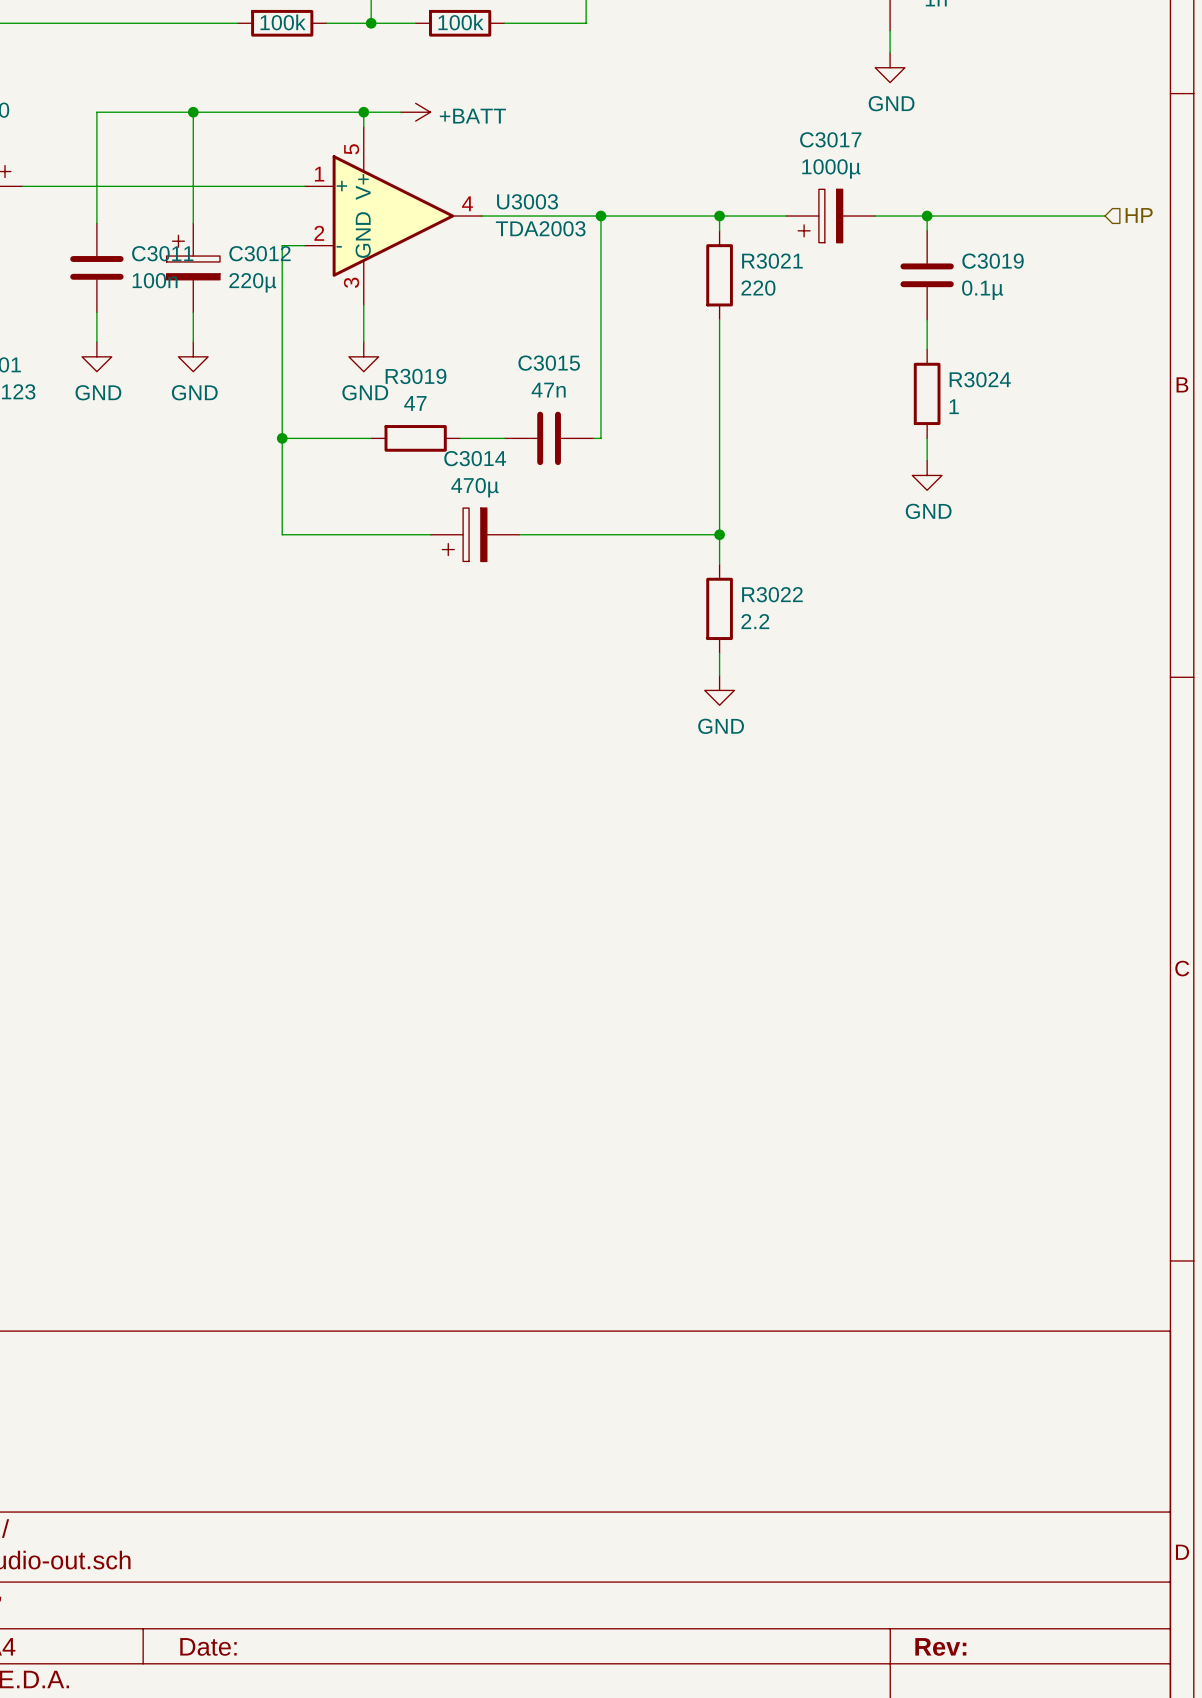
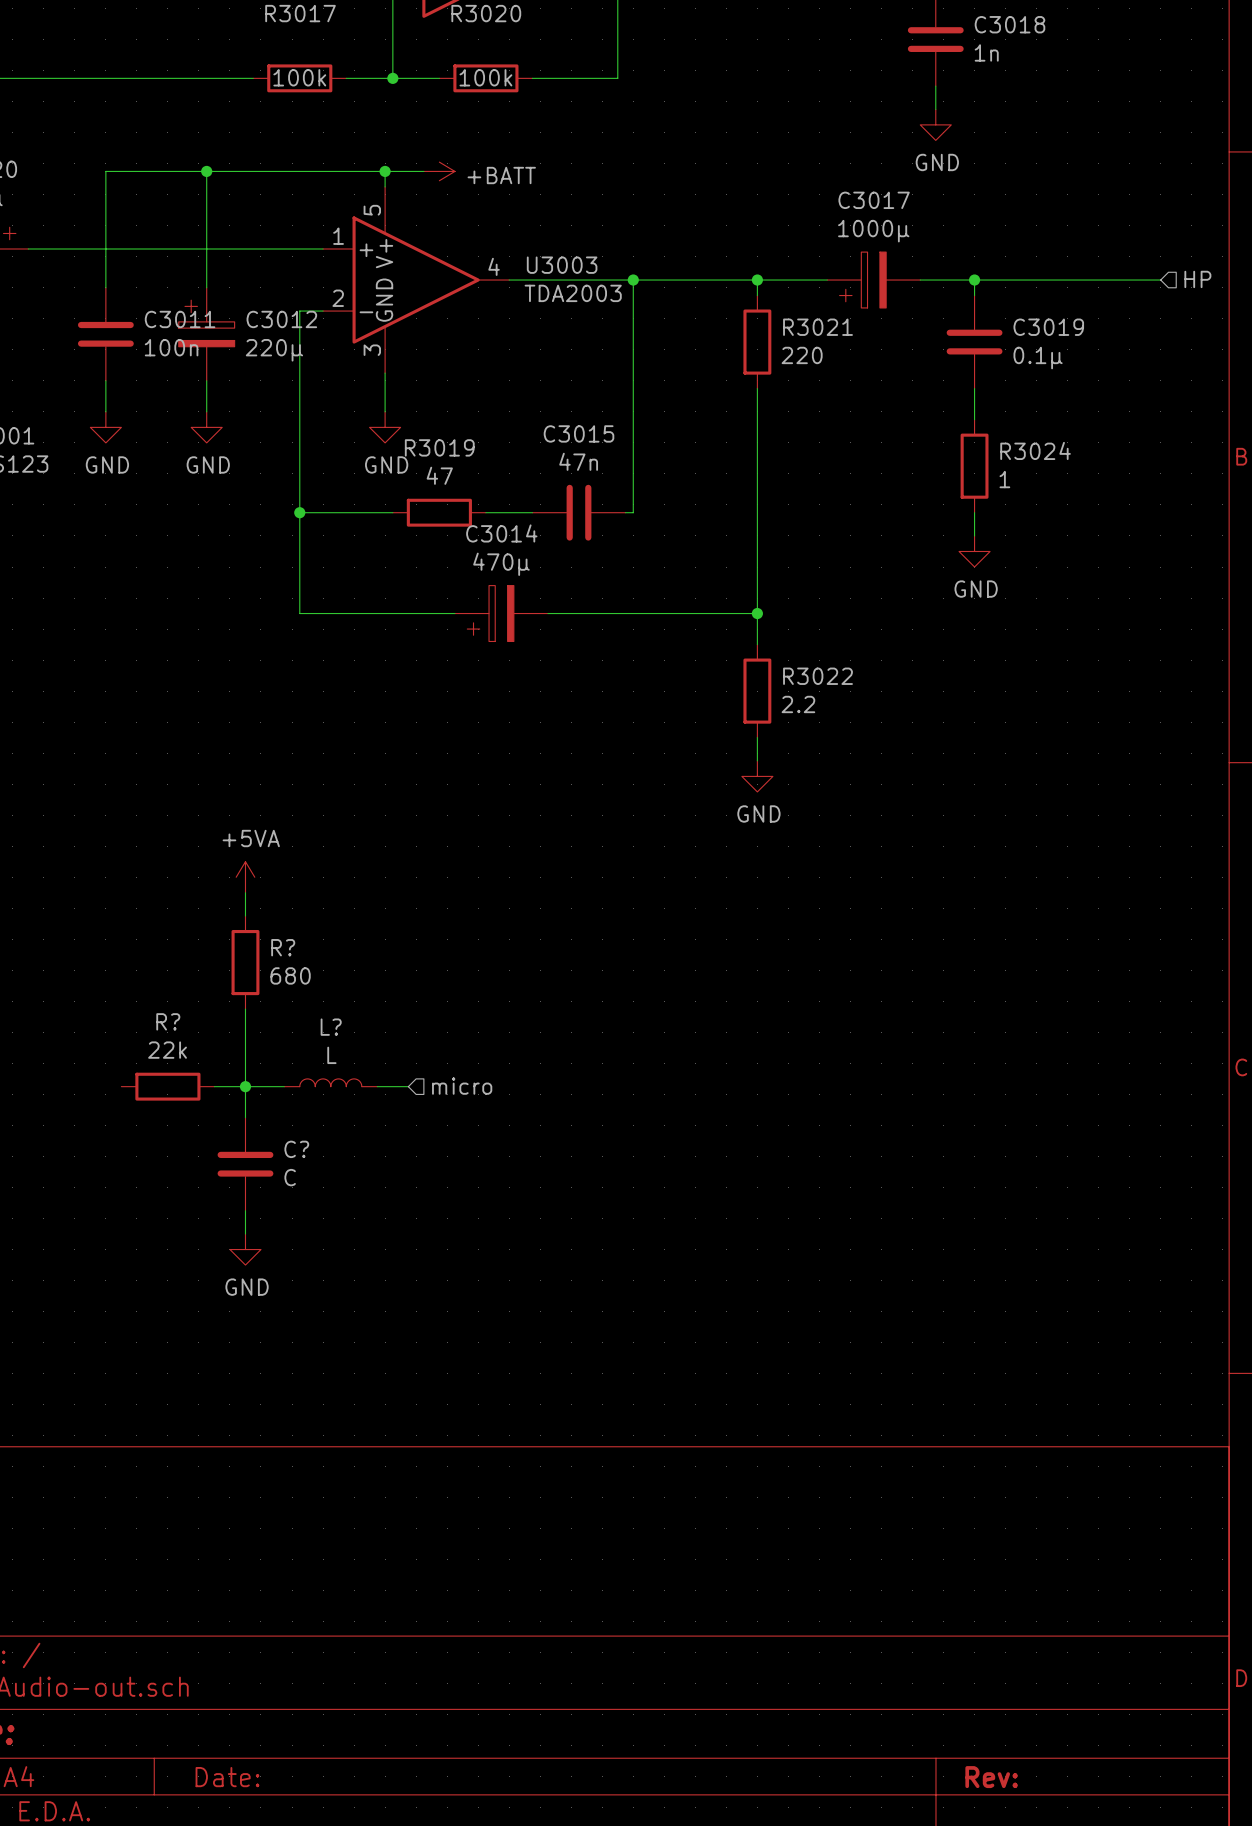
power symbol: none -> +5VA (245, 877)
wire: none -> (245, 892) (245, 916)
R?: none -> 680 (245, 962)
wire: none -> (245, 1009) (245, 1117)
L?: none -> L (330, 1082)
R?: none -> 22k (167, 1086)
wire: none -> (214, 1086) (284, 1086)
junction: none -> (245, 1086)
wire: none -> (377, 1086) (408, 1086)
hierarchical label: none -> micro (462, 1086)
C?: none -> C (245, 1164)
wire: none -> (245, 1210) (245, 1234)
power symbol: none -> GND (245, 1249)

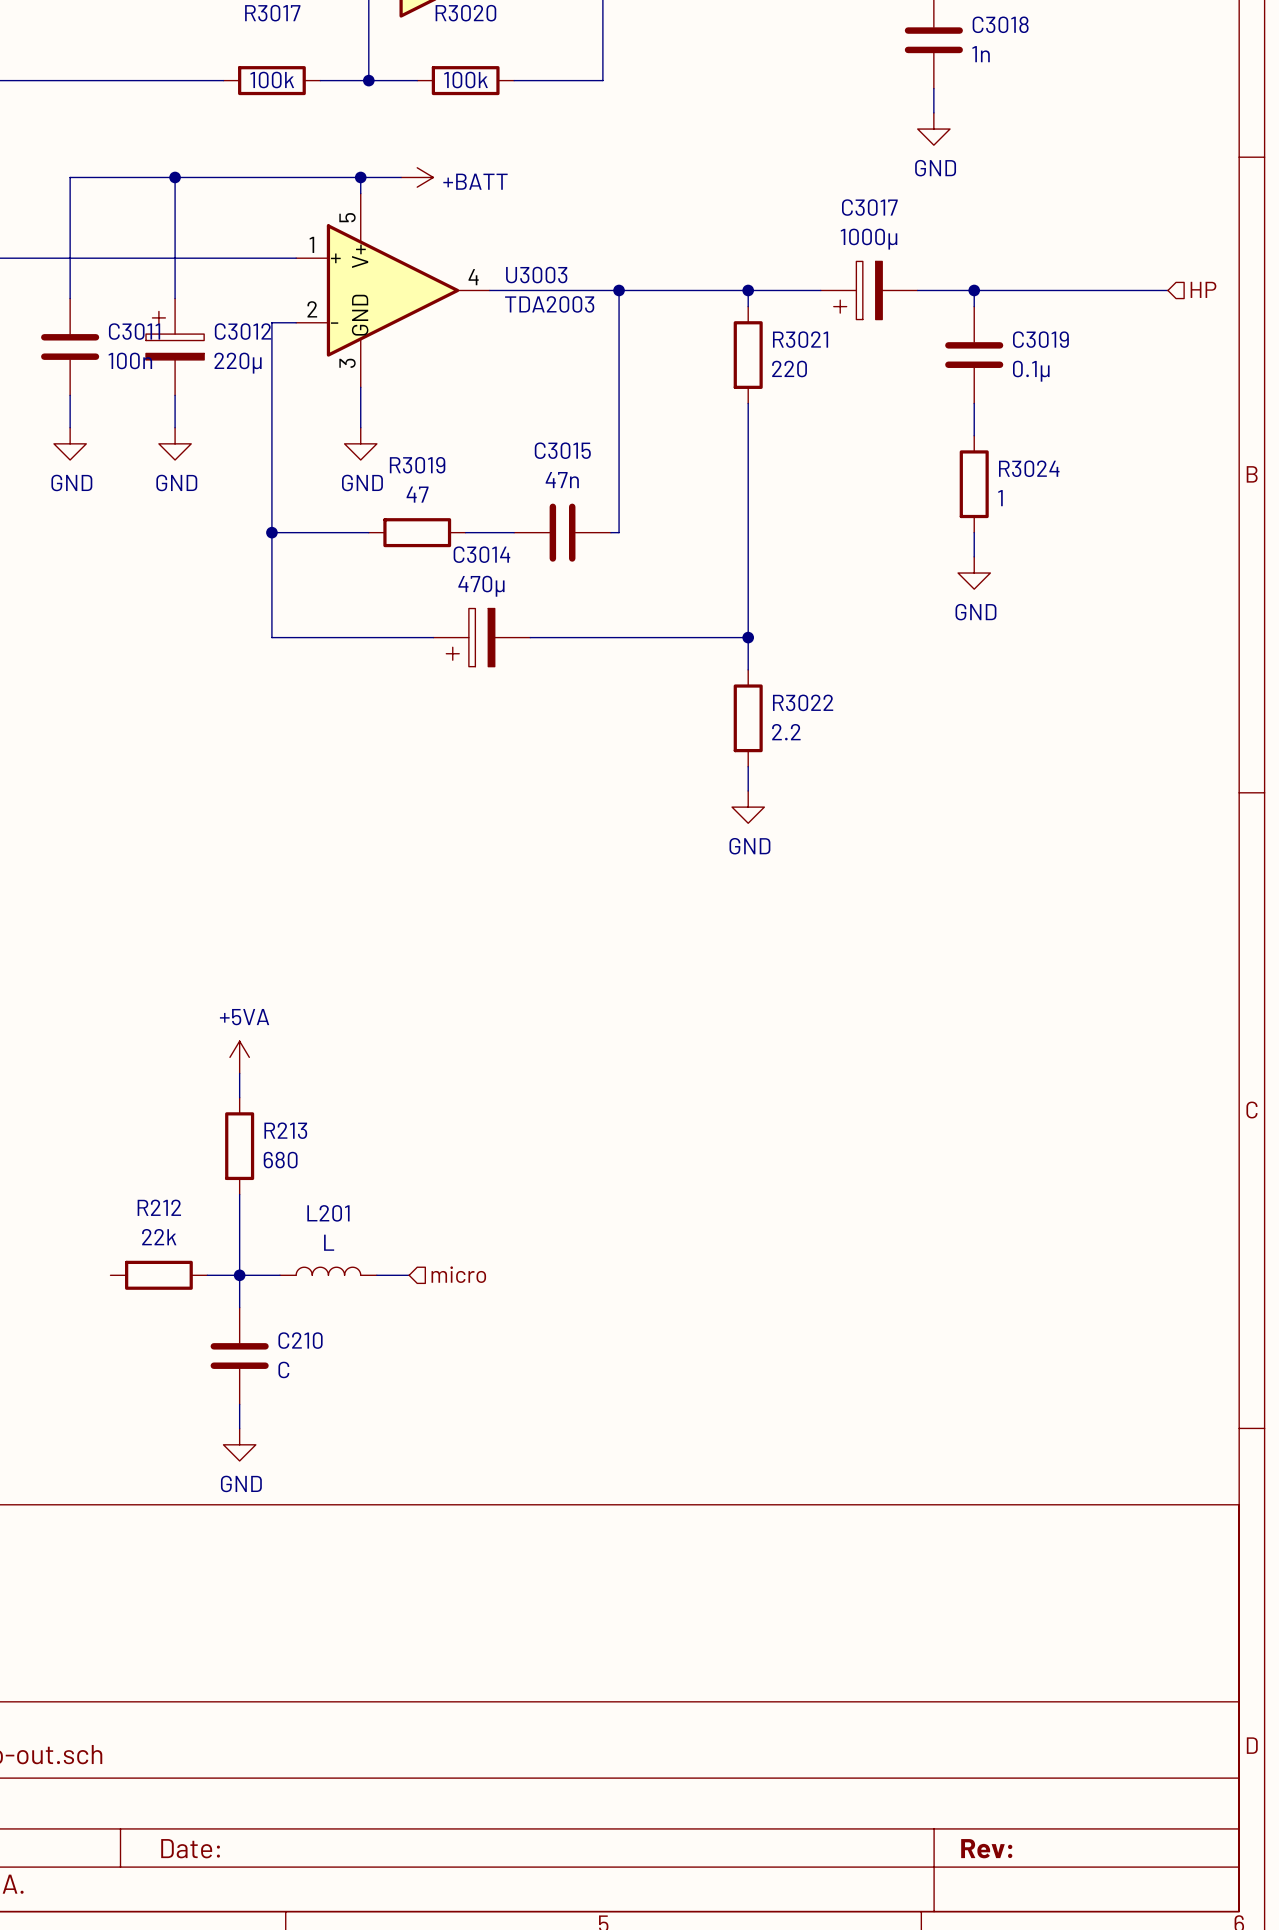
power symbol position: +5VA (245, 877) -> +5VA (239, 1057)
wire: (245, 892) (245, 916) -> (239, 1073) (239, 1097)
R?: 680 (245, 962) -> none
wire: (245, 1009) (245, 1117) -> (239, 1194) (239, 1307)
L?: L (330, 1082) -> none
R?: 22k (167, 1086) -> none
wire: (214, 1086) (284, 1086) -> (207, 1275) (280, 1275)
junction: (245, 1086) -> none
wire: (377, 1086) (408, 1086) -> (376, 1275) (409, 1275)
hierarchical label position: micro (462, 1086) -> micro (458, 1274)
R213: none -> 680 (239, 1146)
C?: C (245, 1164) -> none
wire: (245, 1210) (245, 1234) -> (239, 1404) (239, 1428)
L201: none -> L (328, 1271)
R212: none -> 22k (158, 1275)
junction: none -> (239, 1275)
power symbol position: GND (245, 1249) -> GND (239, 1444)
C210: none -> C (239, 1356)

